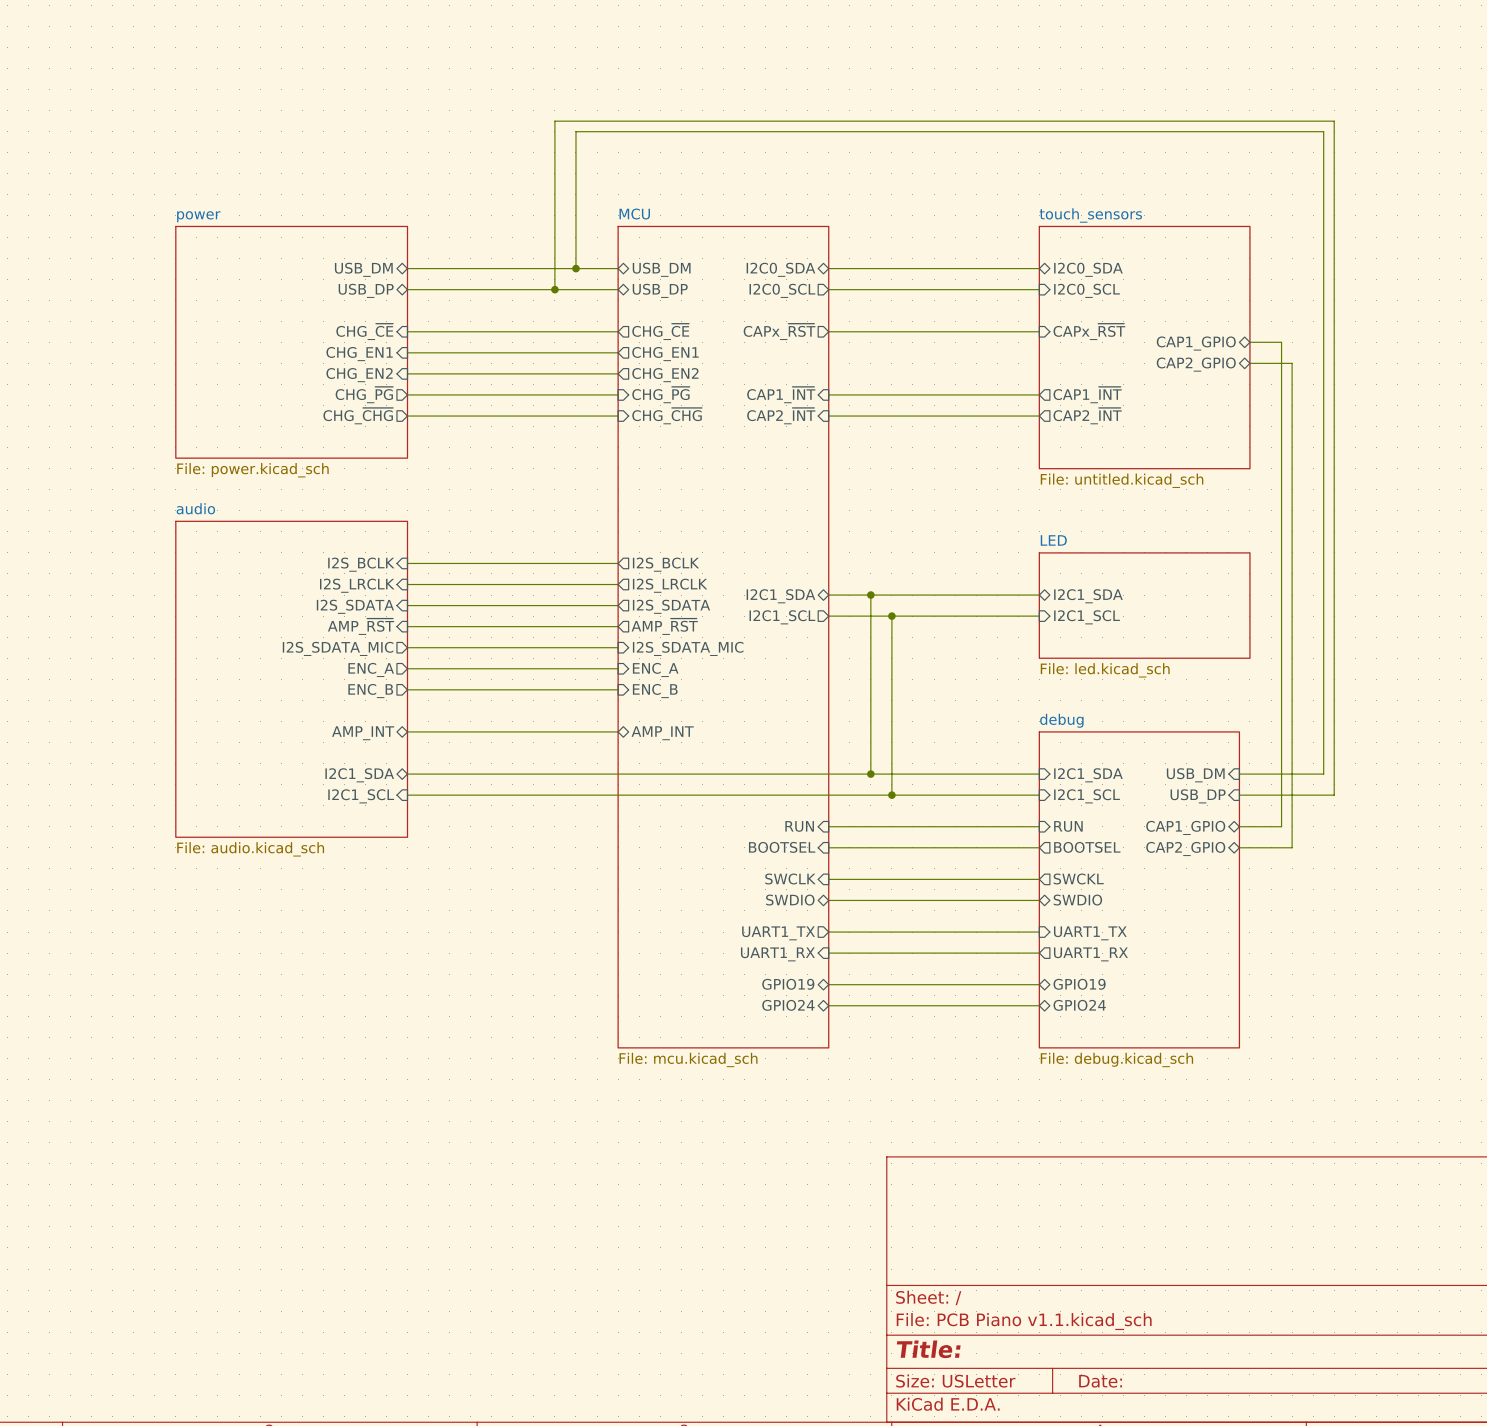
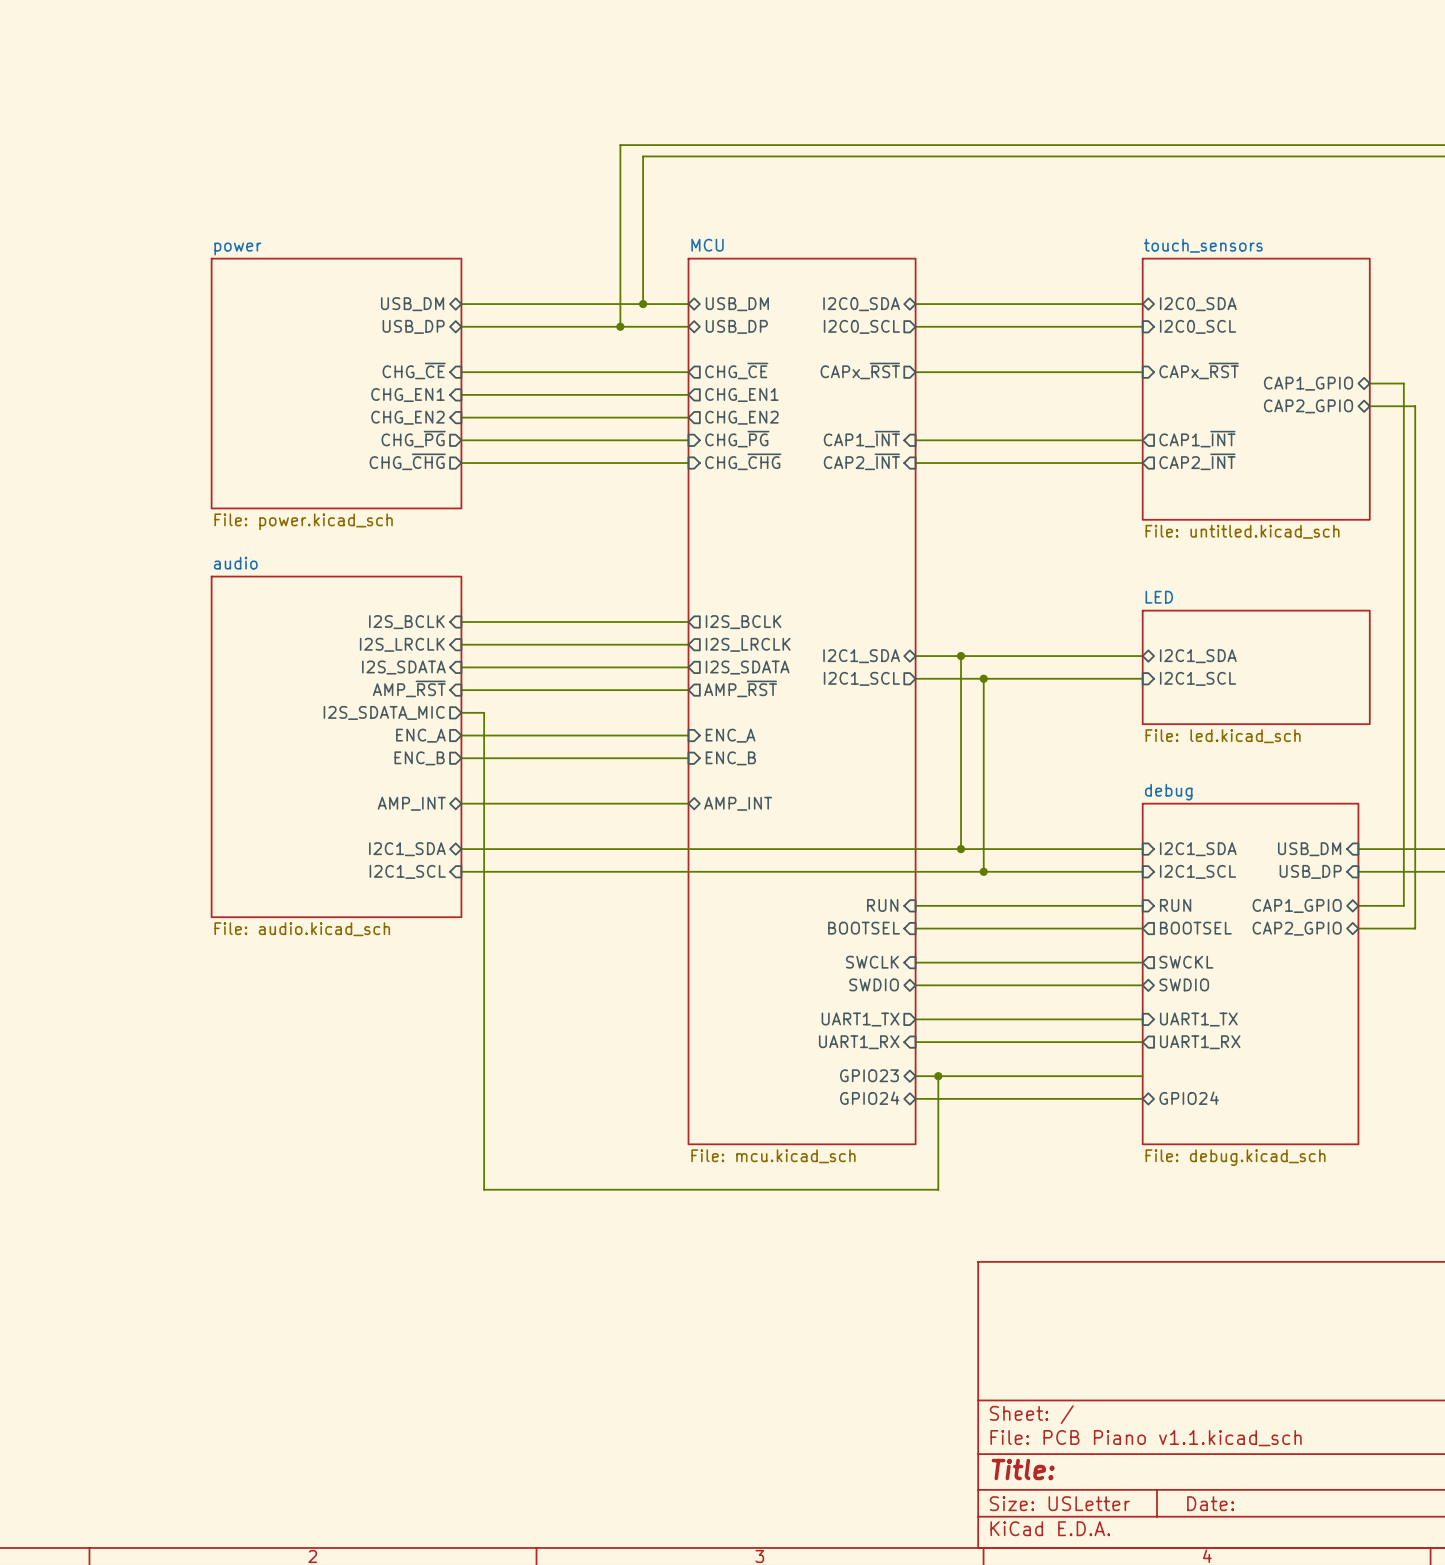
wire: (428, 647) (618, 647) -> (484, 712) (484, 1189) (938, 1189) (938, 1076)
sheet pin: I2S_SDATA_MIC (688, 648) -> none
sheet pin: GPIO19 (788, 984) -> GPIO23 (869, 1075)
junction: none -> (938, 1076)
sheet pin: GPIO19 (1079, 984) -> none

